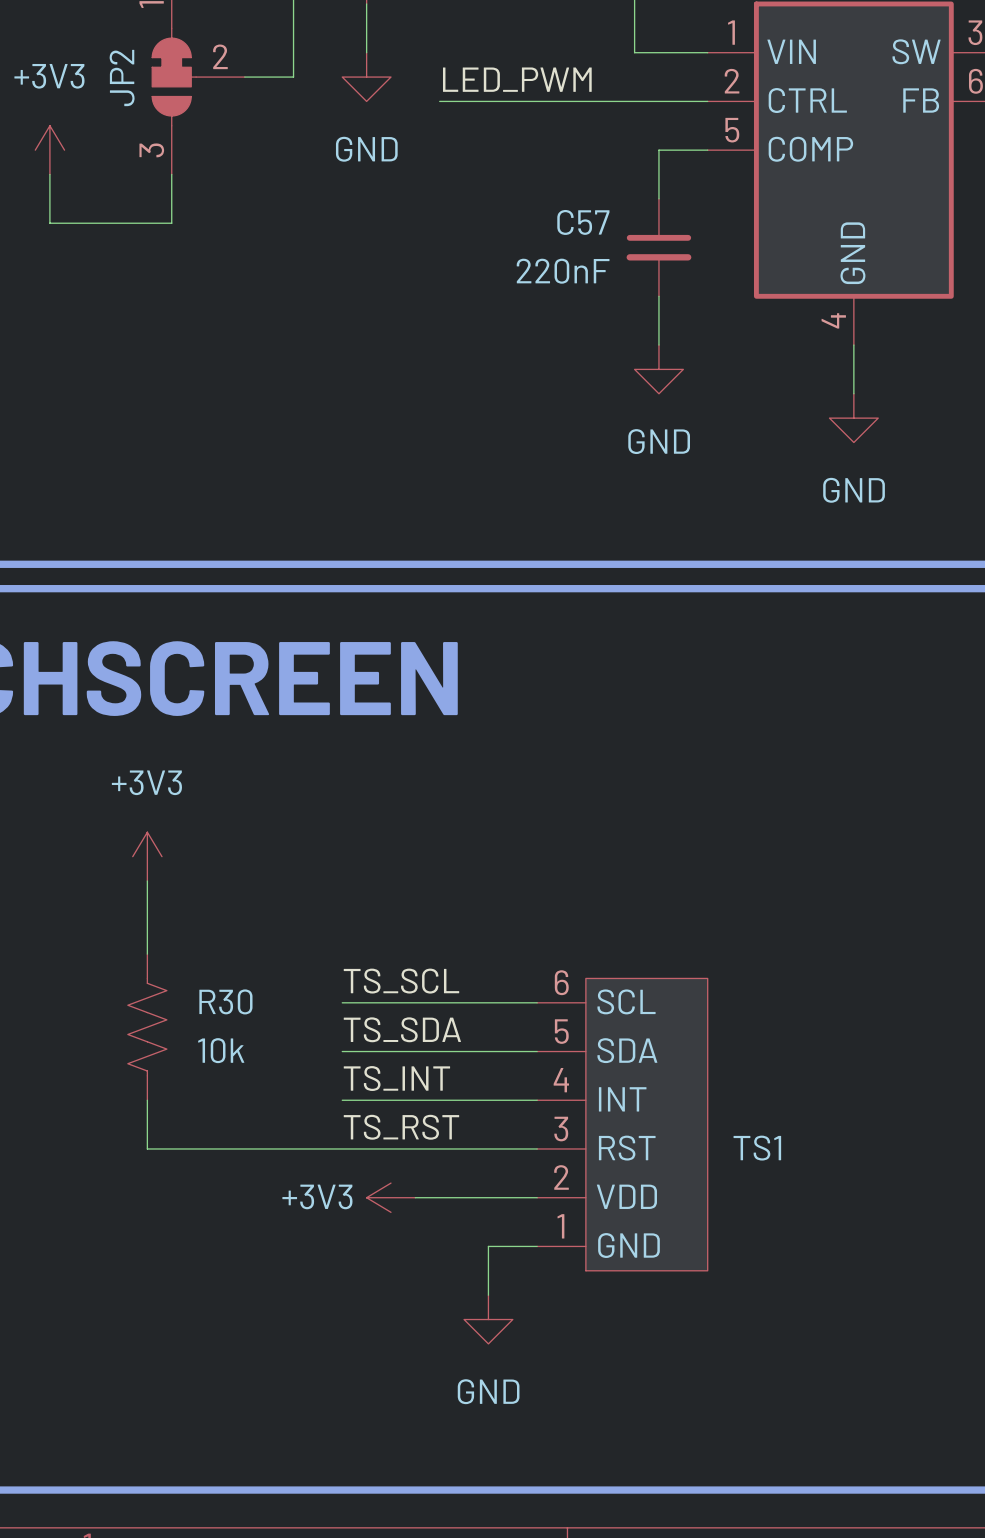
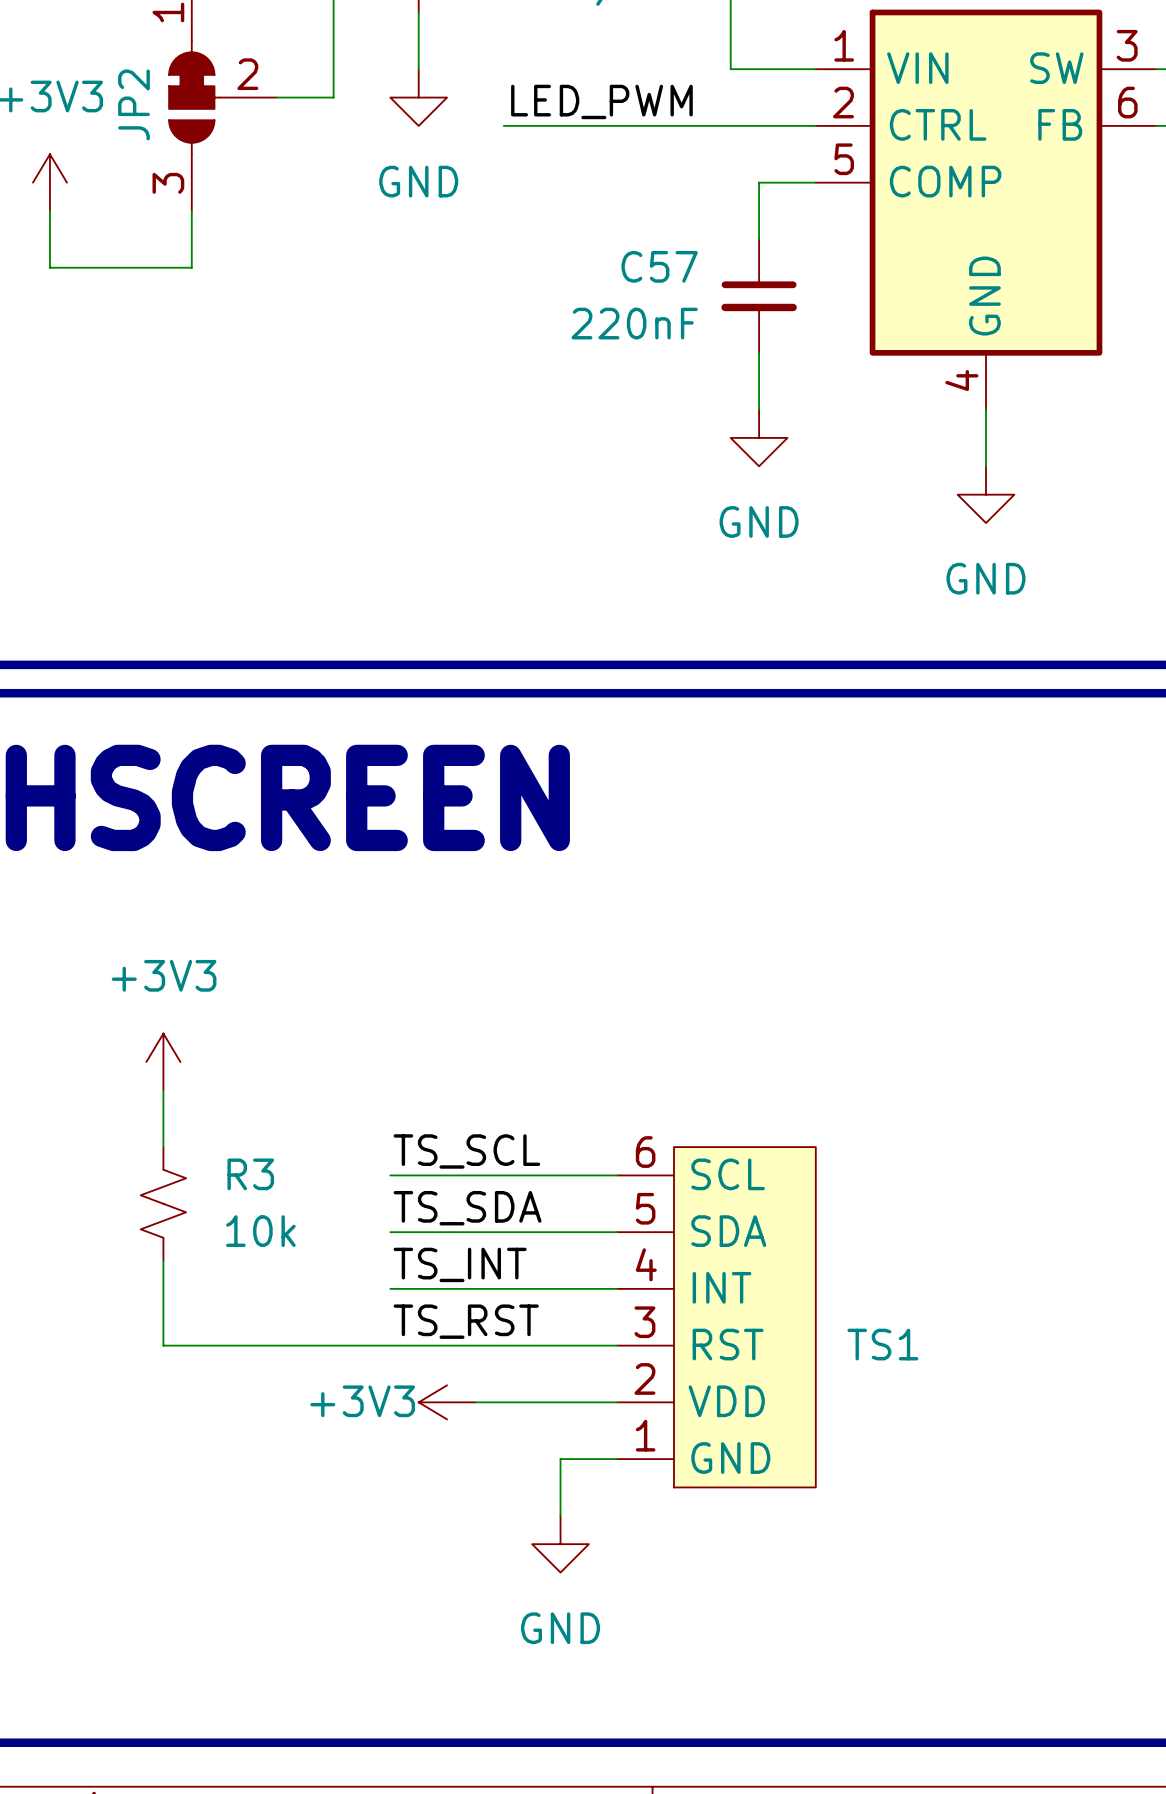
power symbol position: +3V3 (147, 856) -> +3V3 (163, 1061)
R30: 10k (147, 1027) -> none
R3: none -> 10k (163, 1203)

